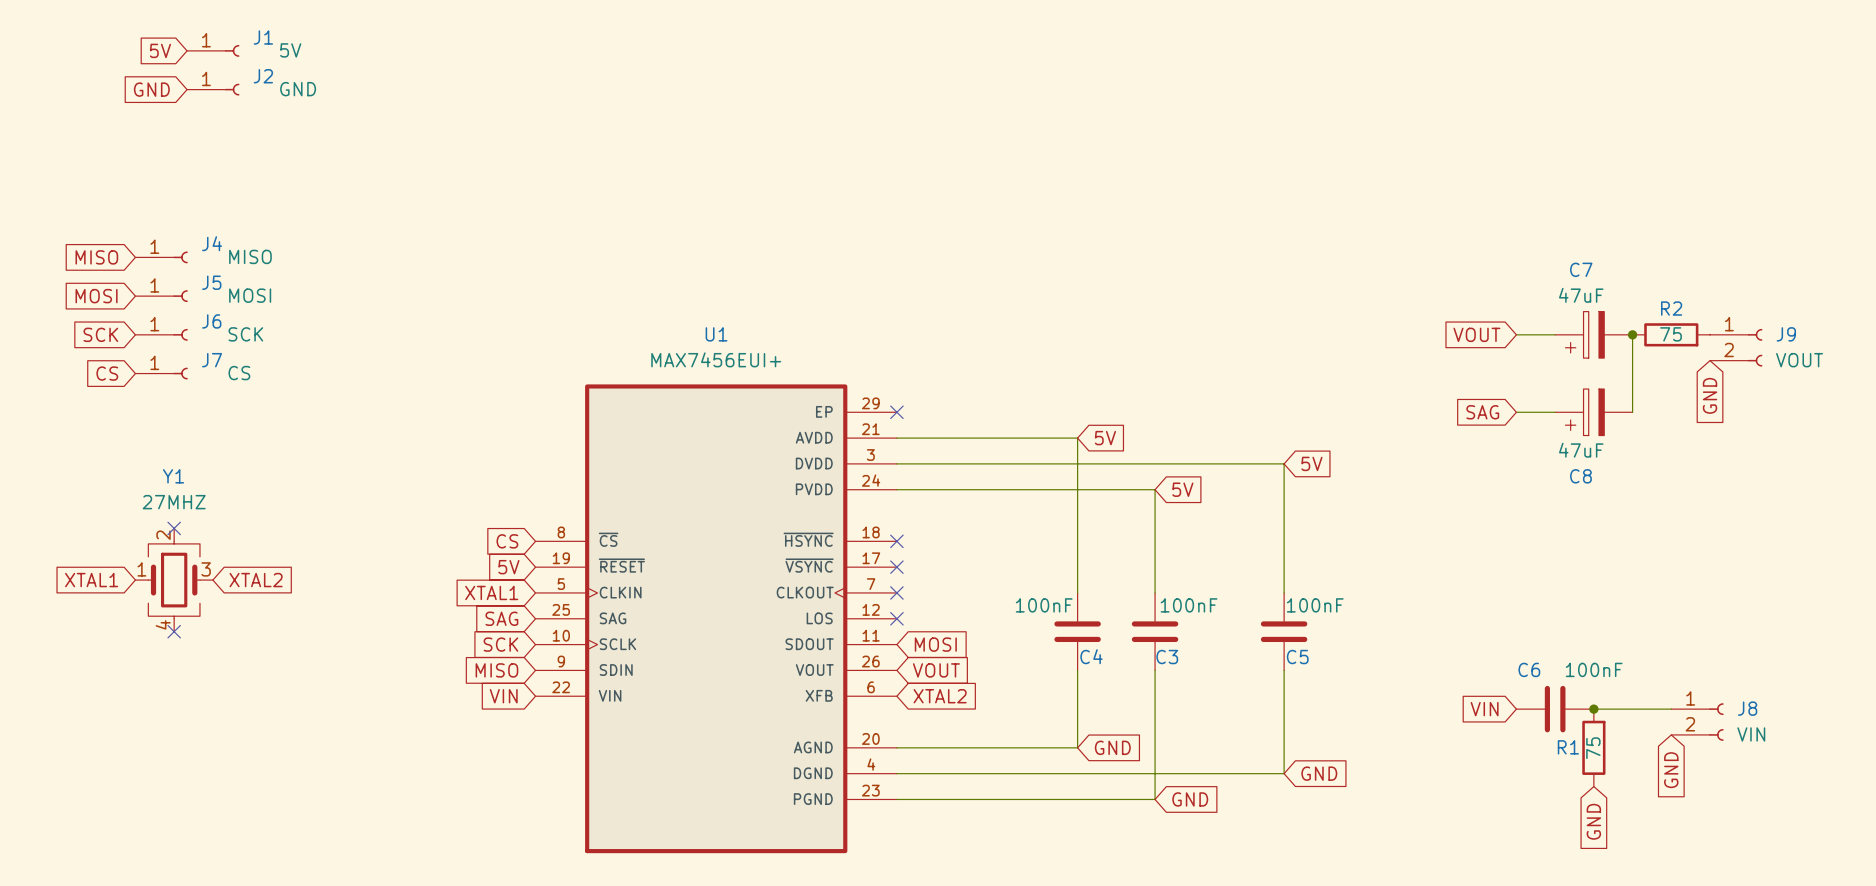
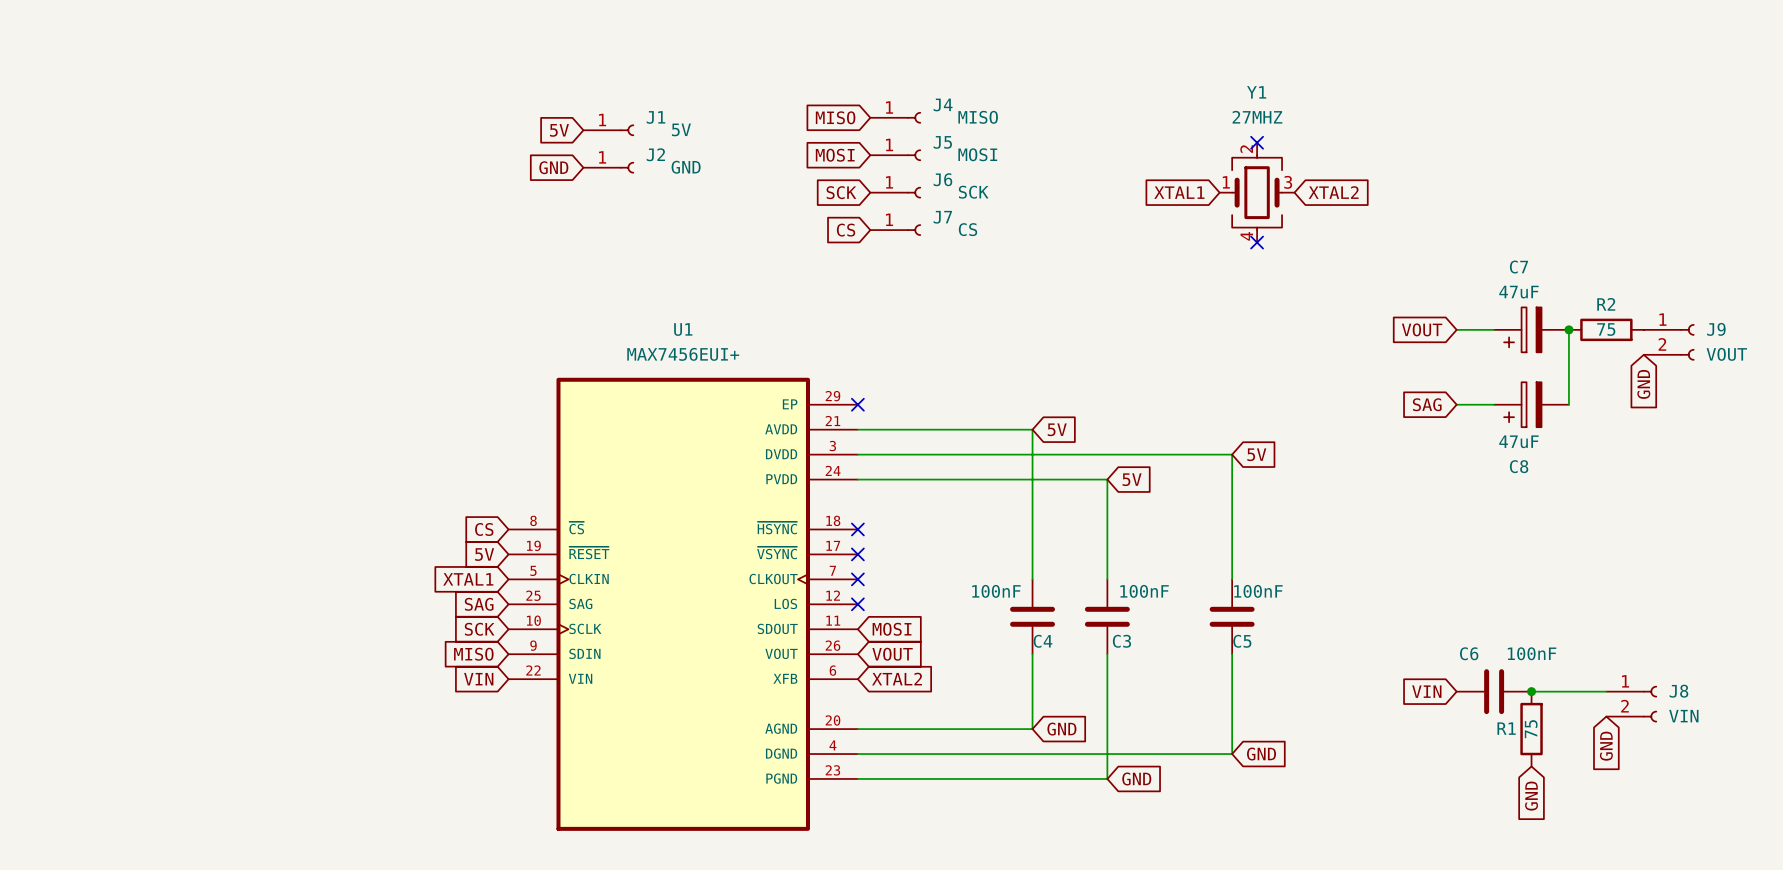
global label: 5V (160, 50) -> none
J1 position: (213, 50) -> (608, 130)
global label: GND (151, 89) -> none
J2 position: (213, 89) -> (608, 167)
global label: none -> MISO (835, 117)
global label: none -> 5V (559, 130)
no-connect mark: none -> (1257, 142)
global label: none -> MOSI (835, 155)
global label: none -> GND (553, 167)
global label: none -> SCK (841, 192)
global label: none -> XTAL1 (1179, 192)
global label: none -> XTAL2 (1333, 192)
global label: none -> CS (846, 230)
no-connect mark: none -> (1257, 242)
global label: MISO (96, 257) -> none
J4 position: (161, 257) -> (895, 117)
global label: MOSI (96, 296) -> none
J5 position: (161, 296) -> (895, 155)
global label: SCK (100, 334) -> none
J6 position: (161, 334) -> (895, 192)
global label: CS (107, 373) -> none
J7 position: (161, 373) -> (895, 230)
no-connect mark: (174, 528) -> none
global label: XTAL1 (91, 580) -> none
Y1 position: (174, 580) -> (1257, 192)
global label: XTAL2 (256, 580) -> none
no-connect mark: (174, 631) -> none

